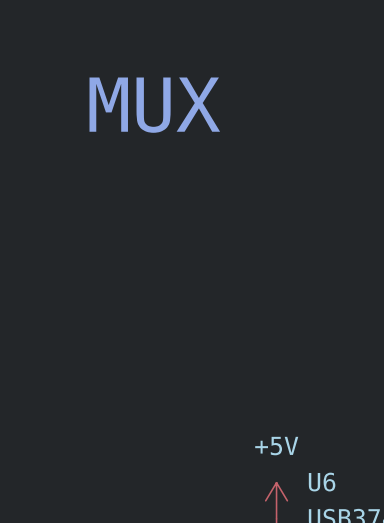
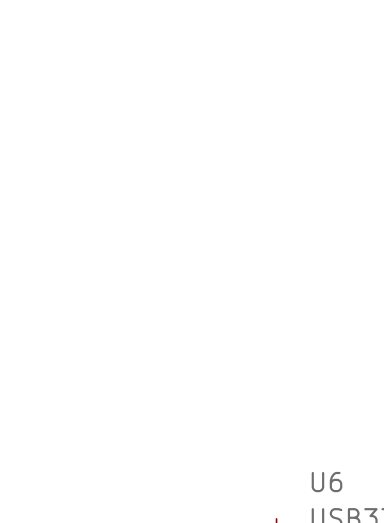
text: MUX (154, 105) -> none
power symbol: +5V (276, 500) -> none

